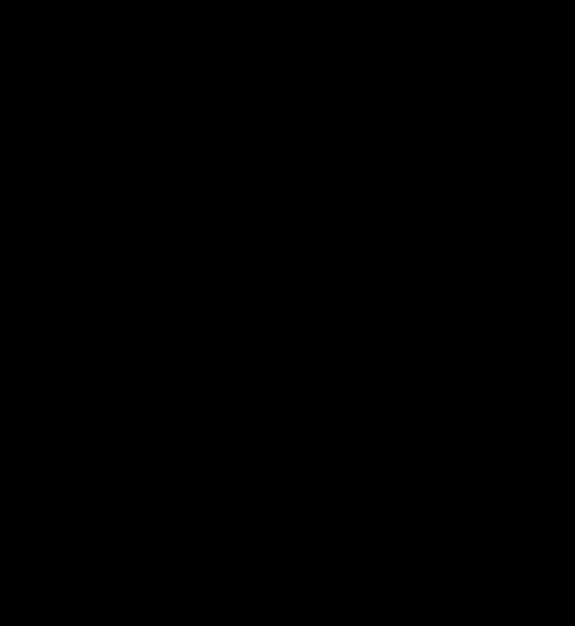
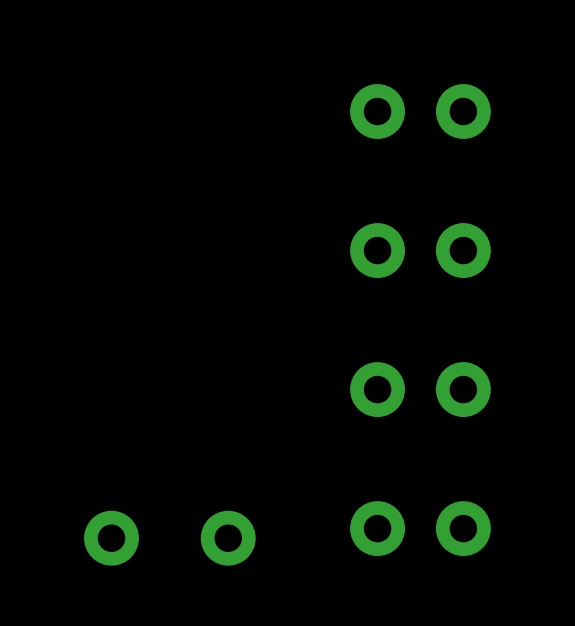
part: none -> (420, 111)
part: none -> (420, 250)
part: none -> (420, 389)
part: none -> (420, 528)
part: none -> (169, 538)

